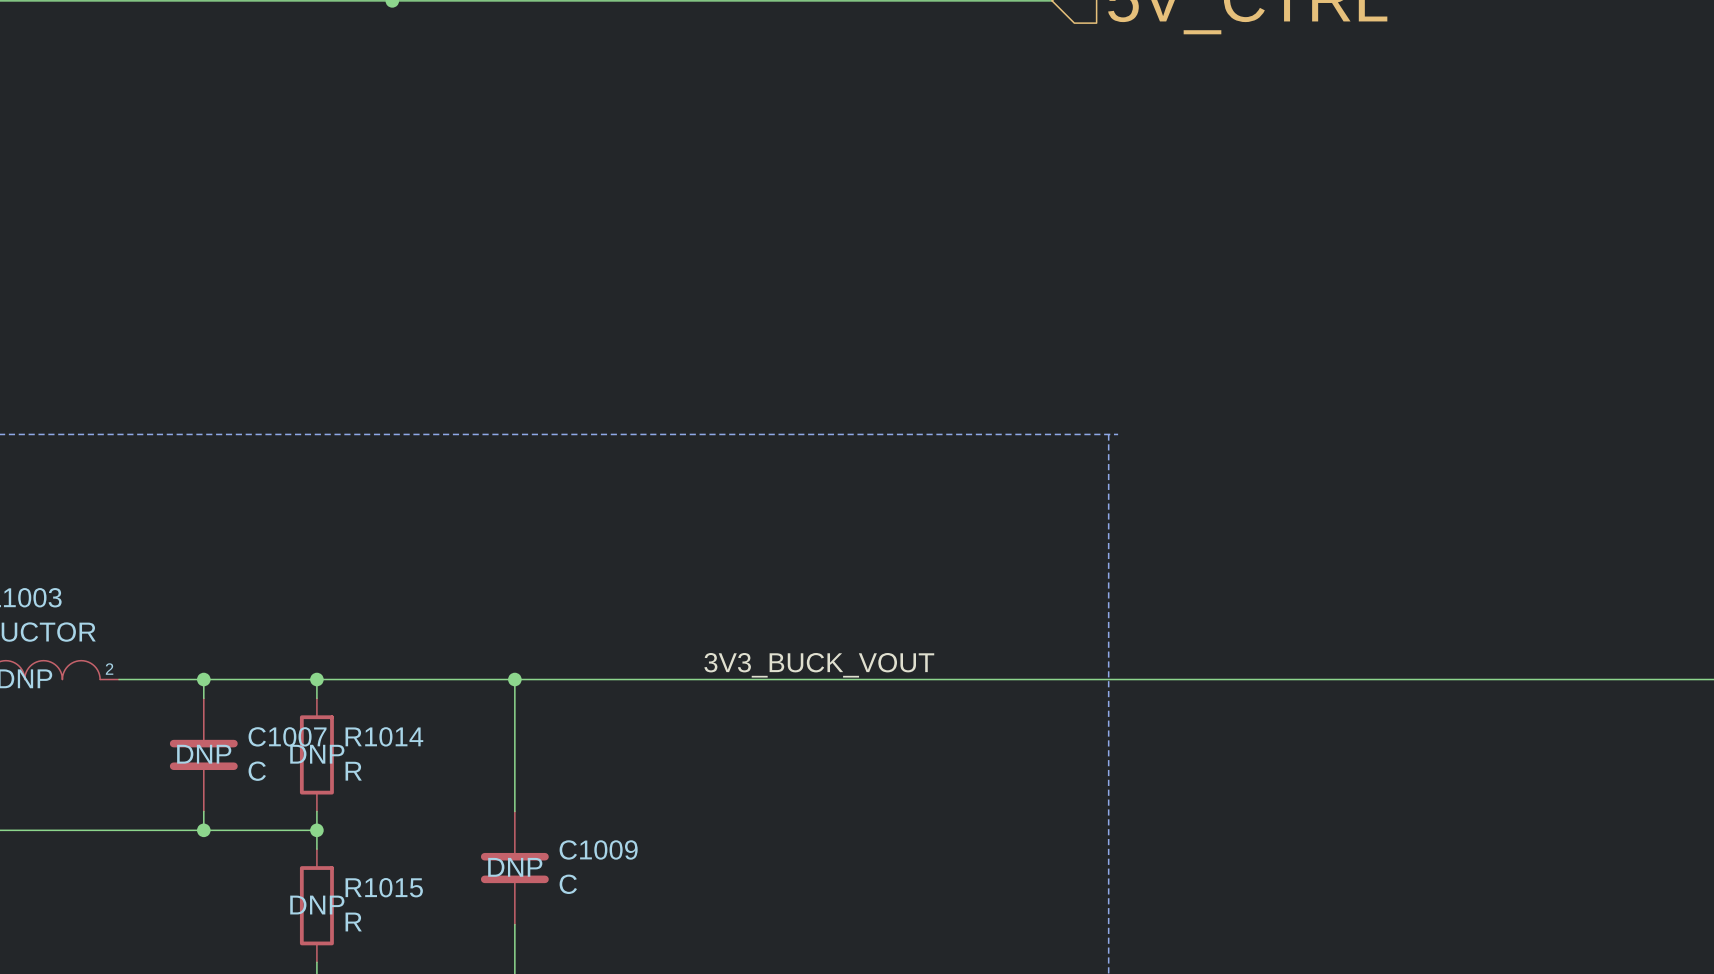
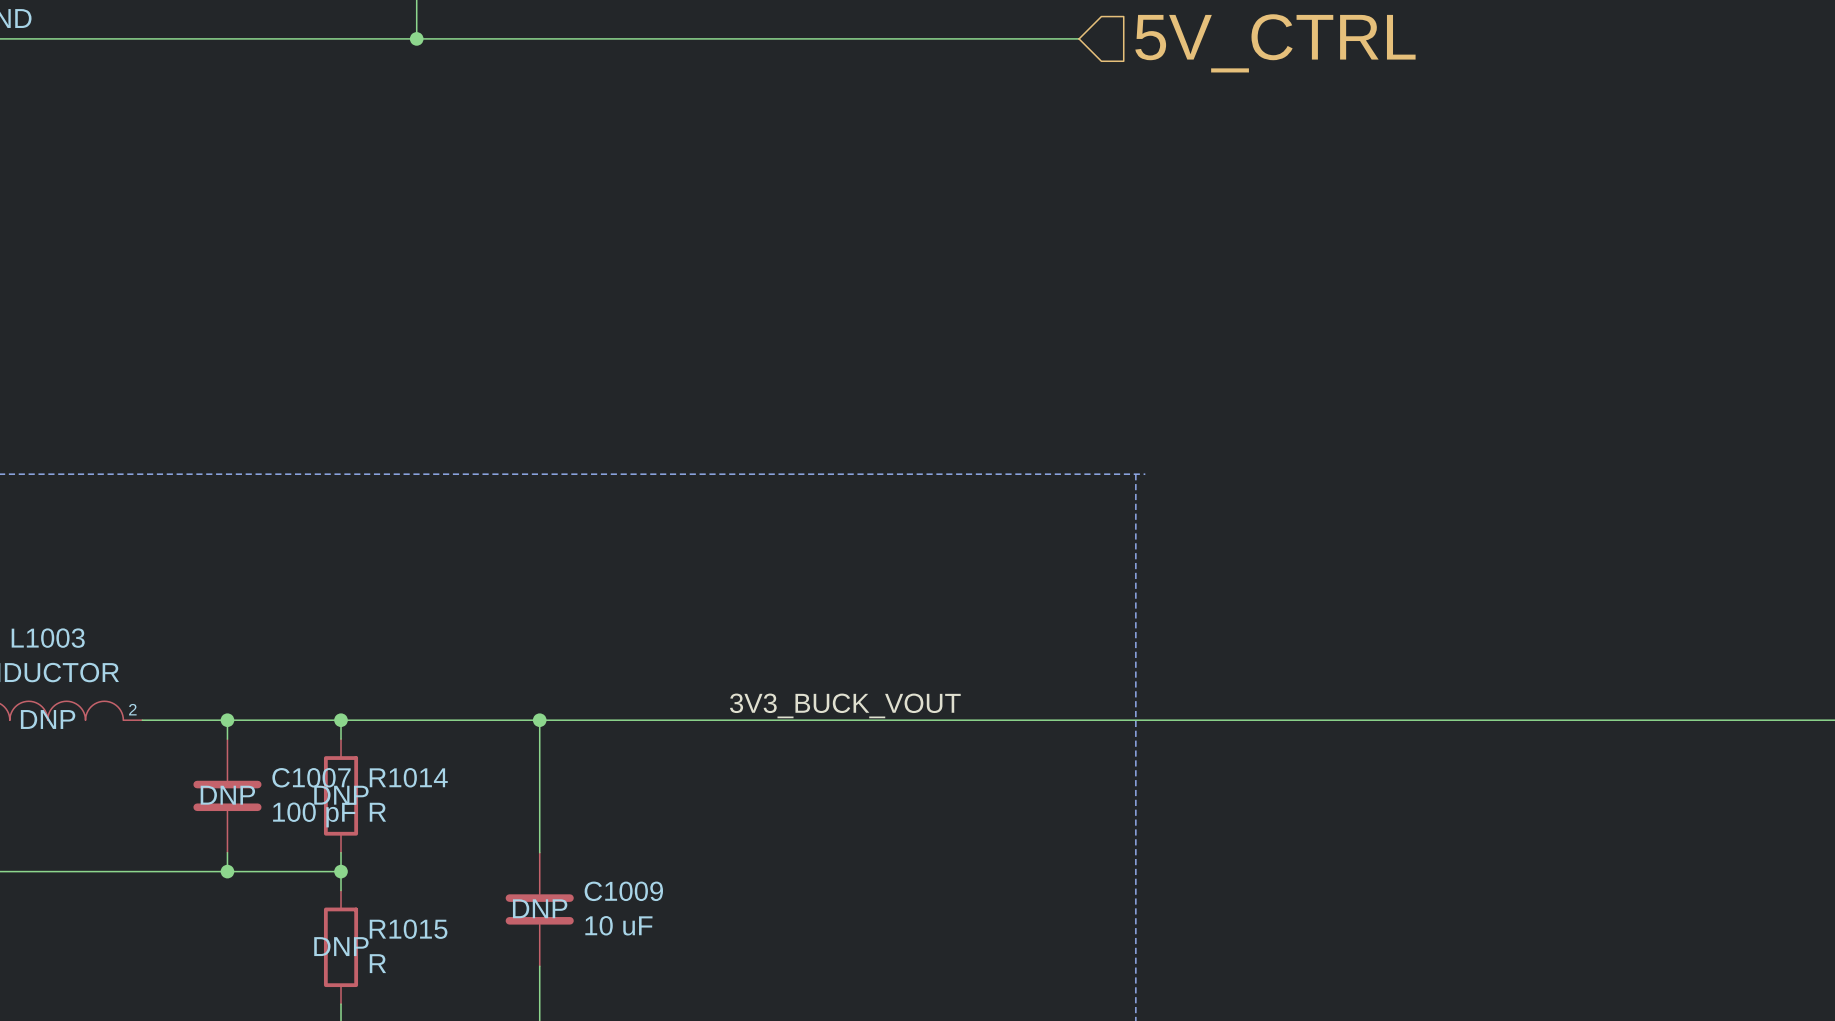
C1007 value: C (257, 771) -> 100 pF (314, 814)
C1009 value: C (568, 884) -> 10 uF (618, 925)

